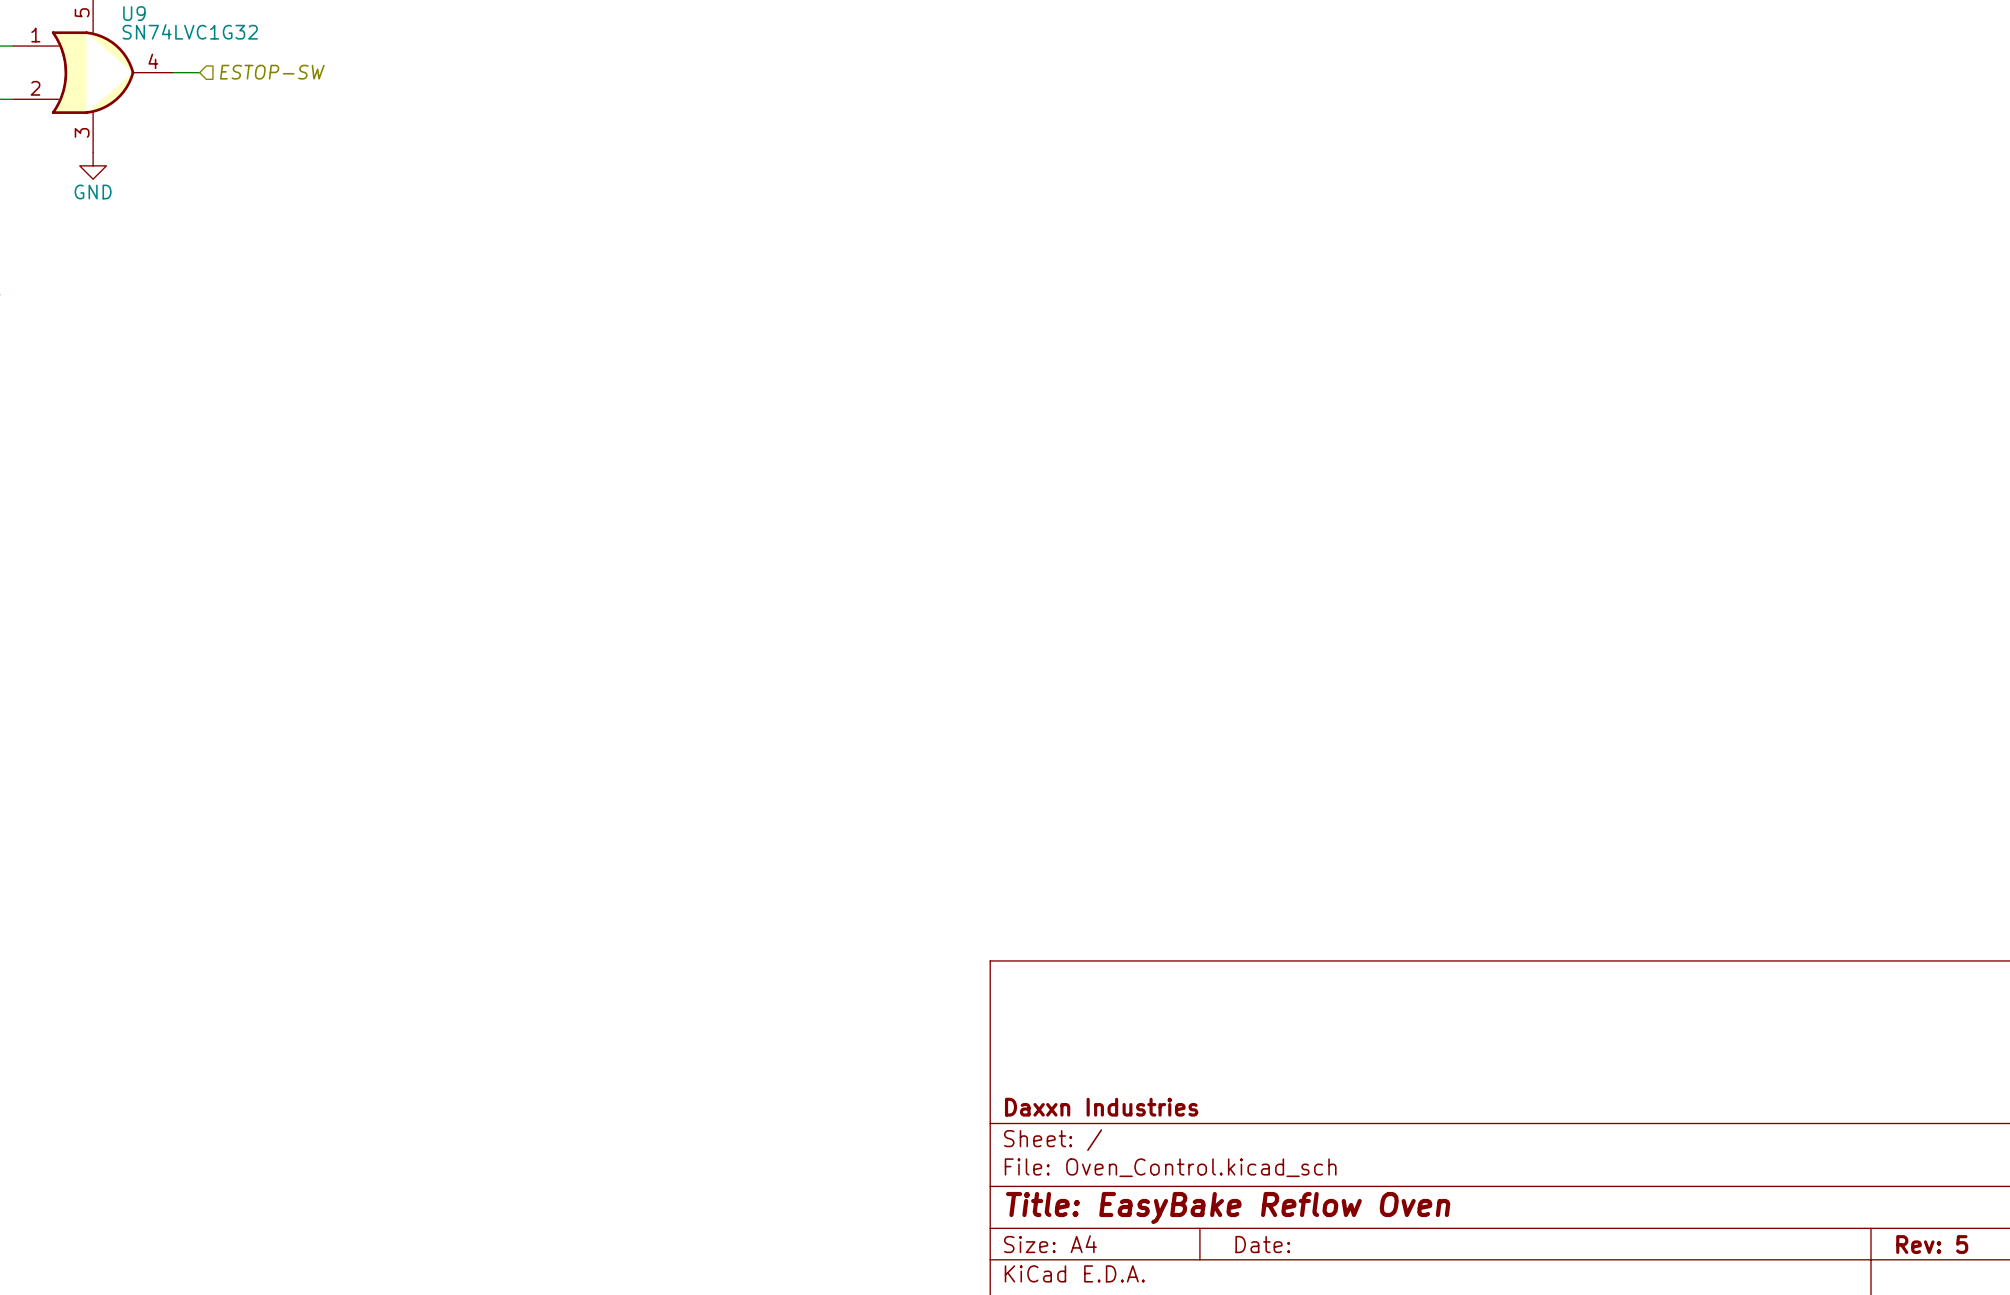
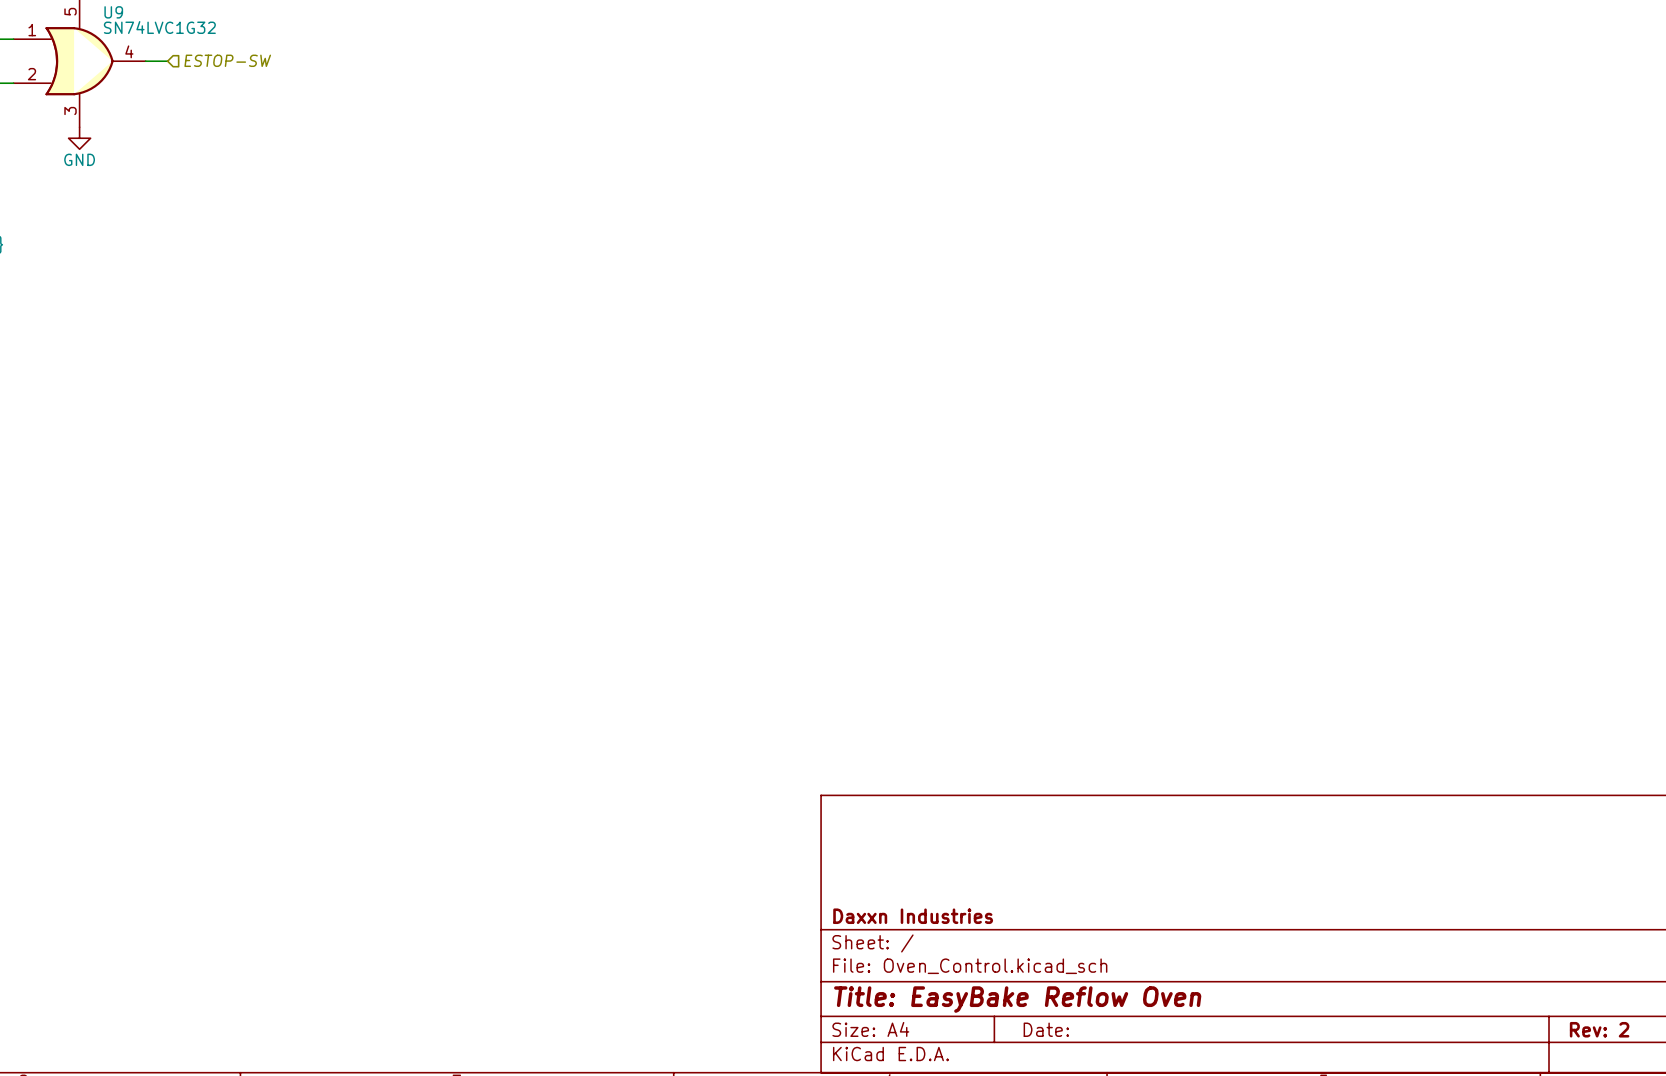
title block: Rev: 5 (1932, 1244) -> Rev: 2 (1599, 1029)

